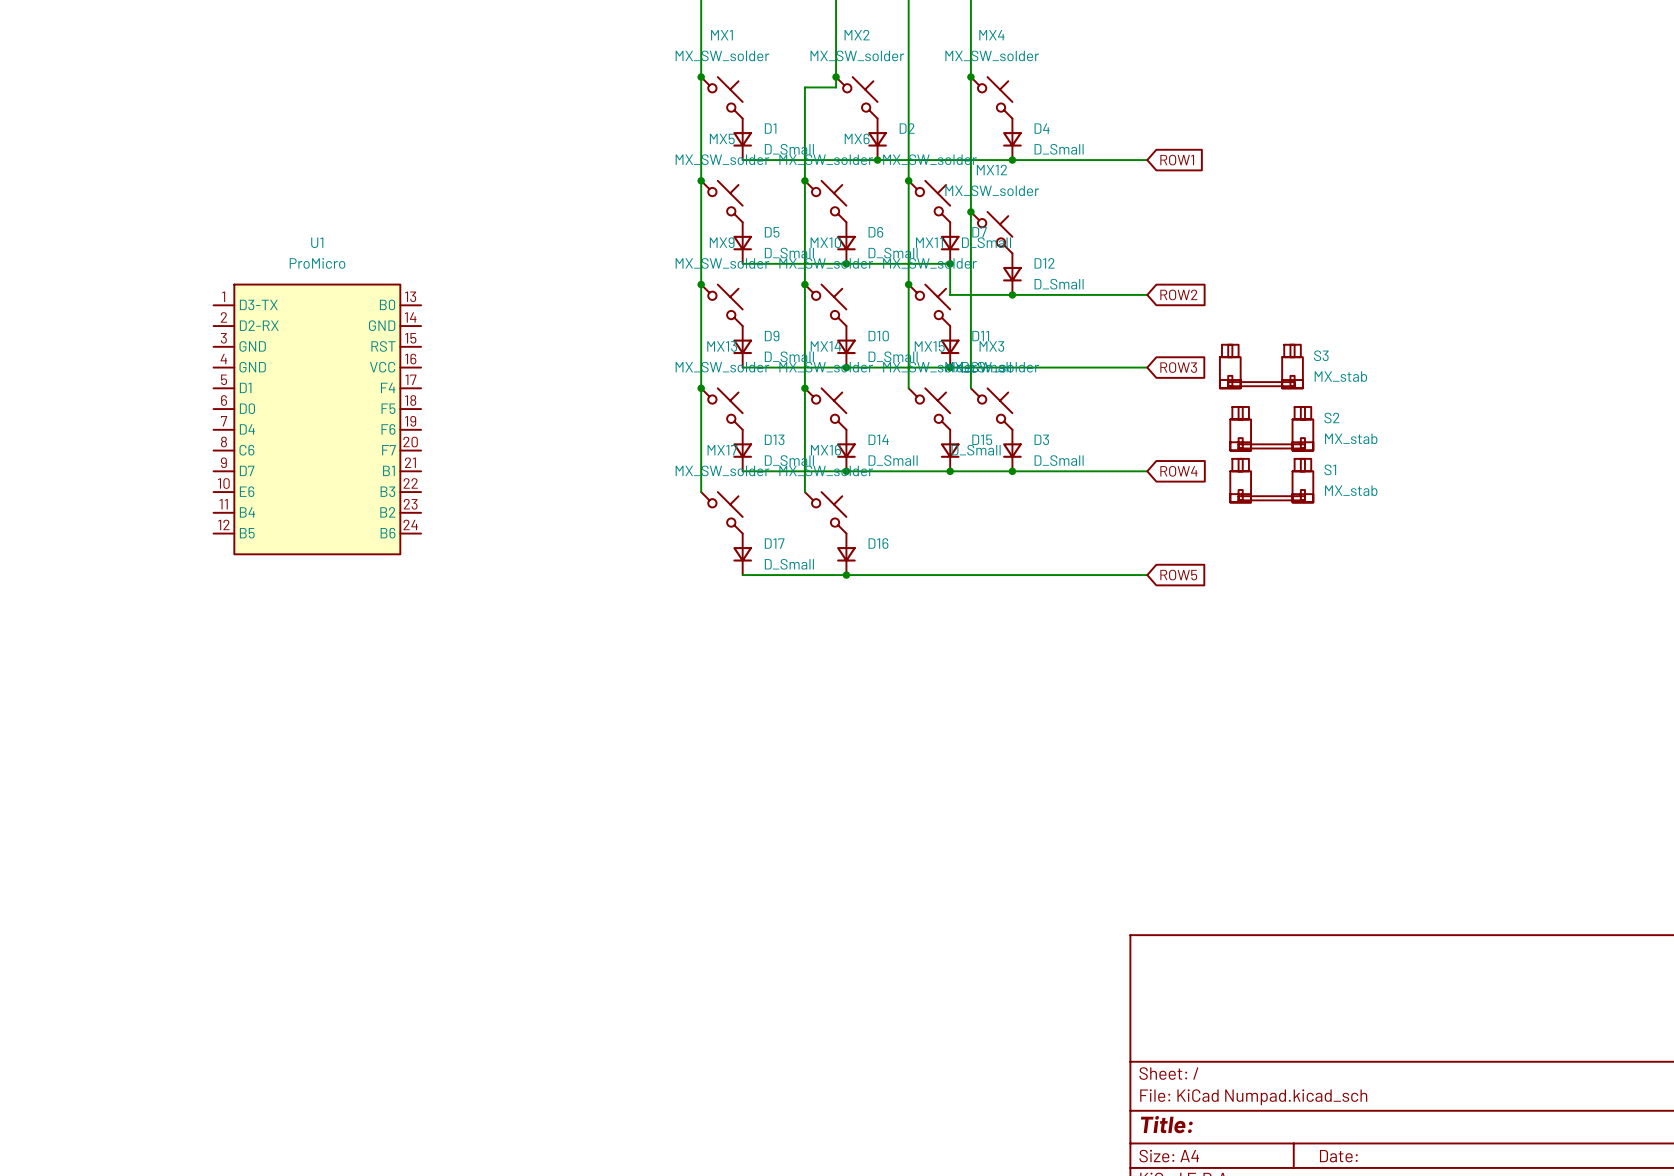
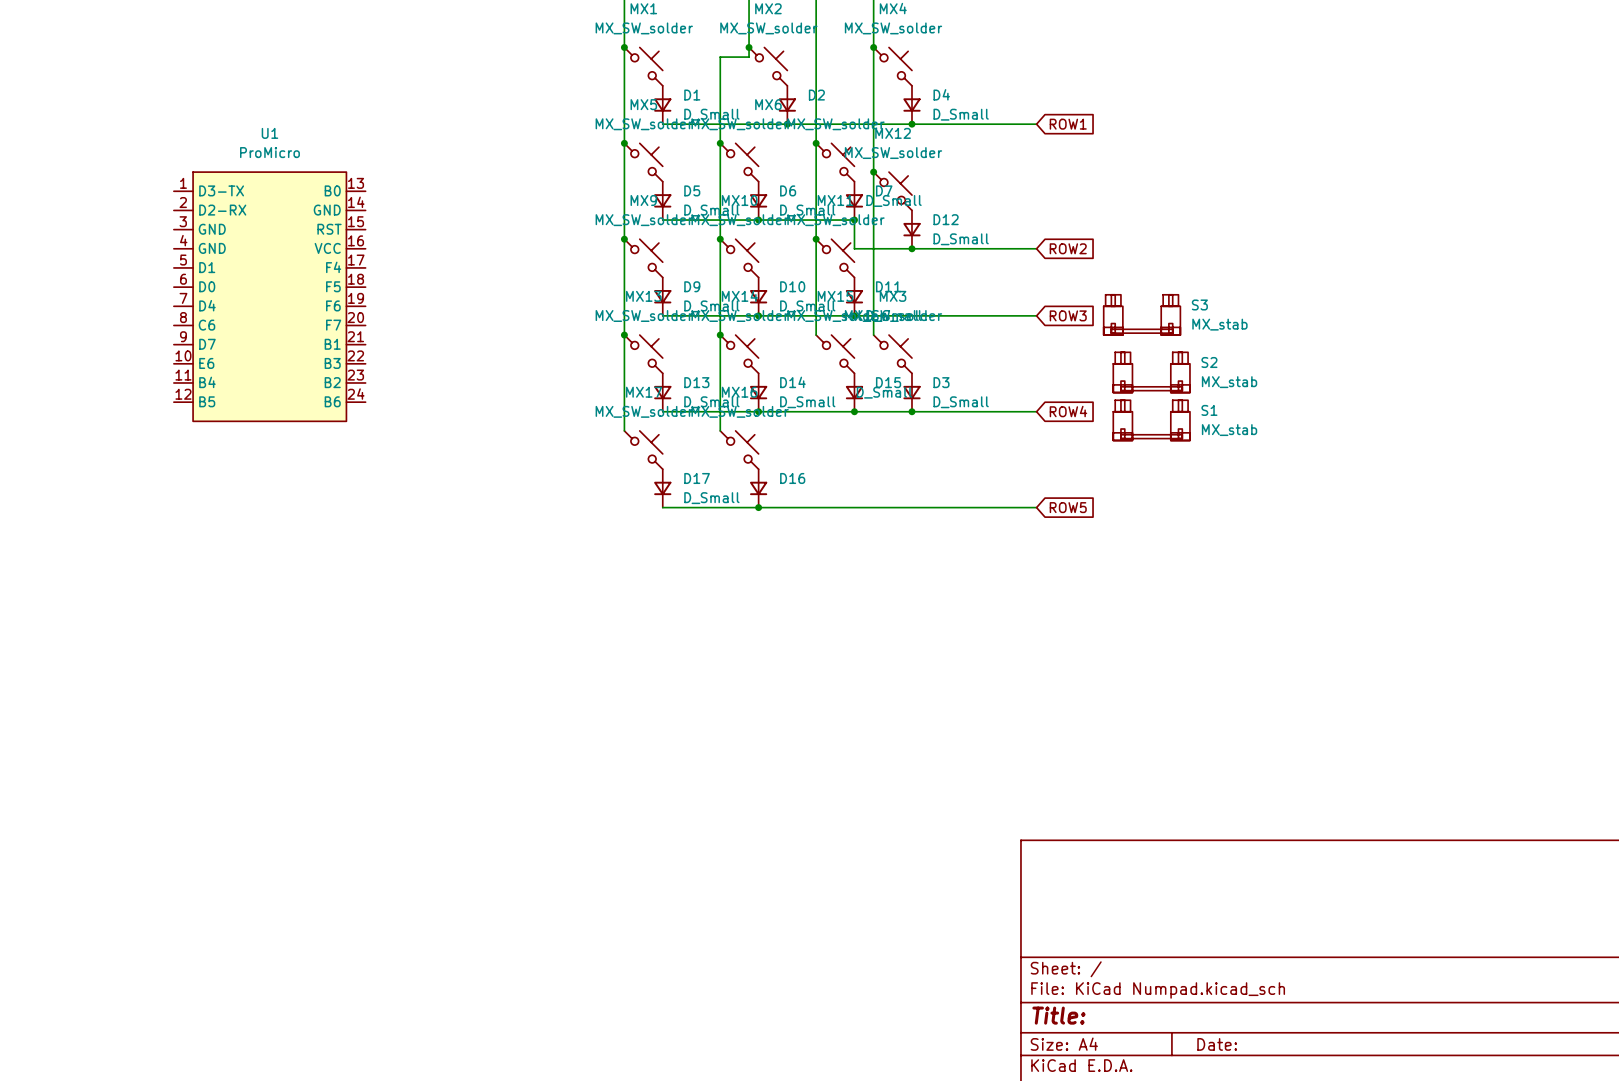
U1 position: (317, 419) -> (269, 296)

